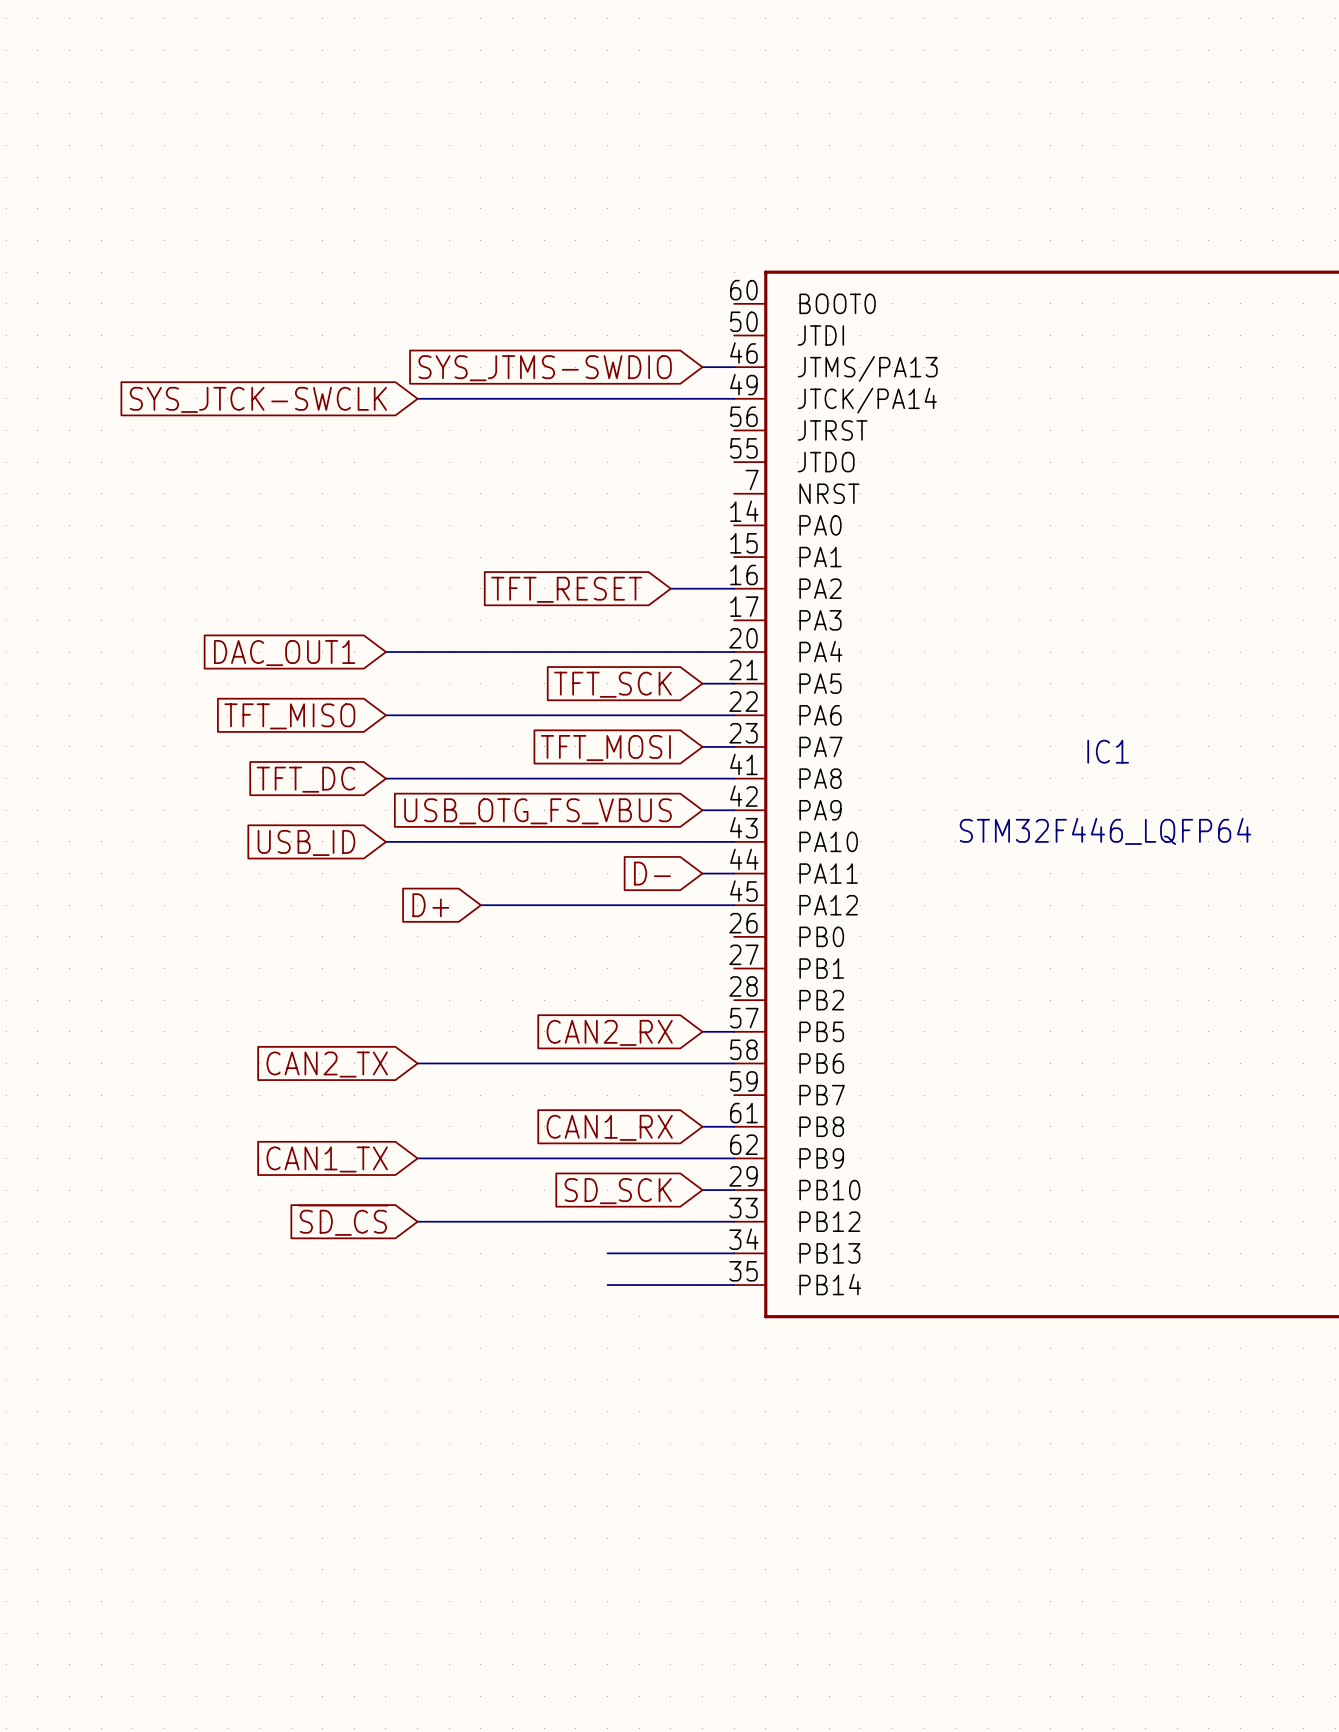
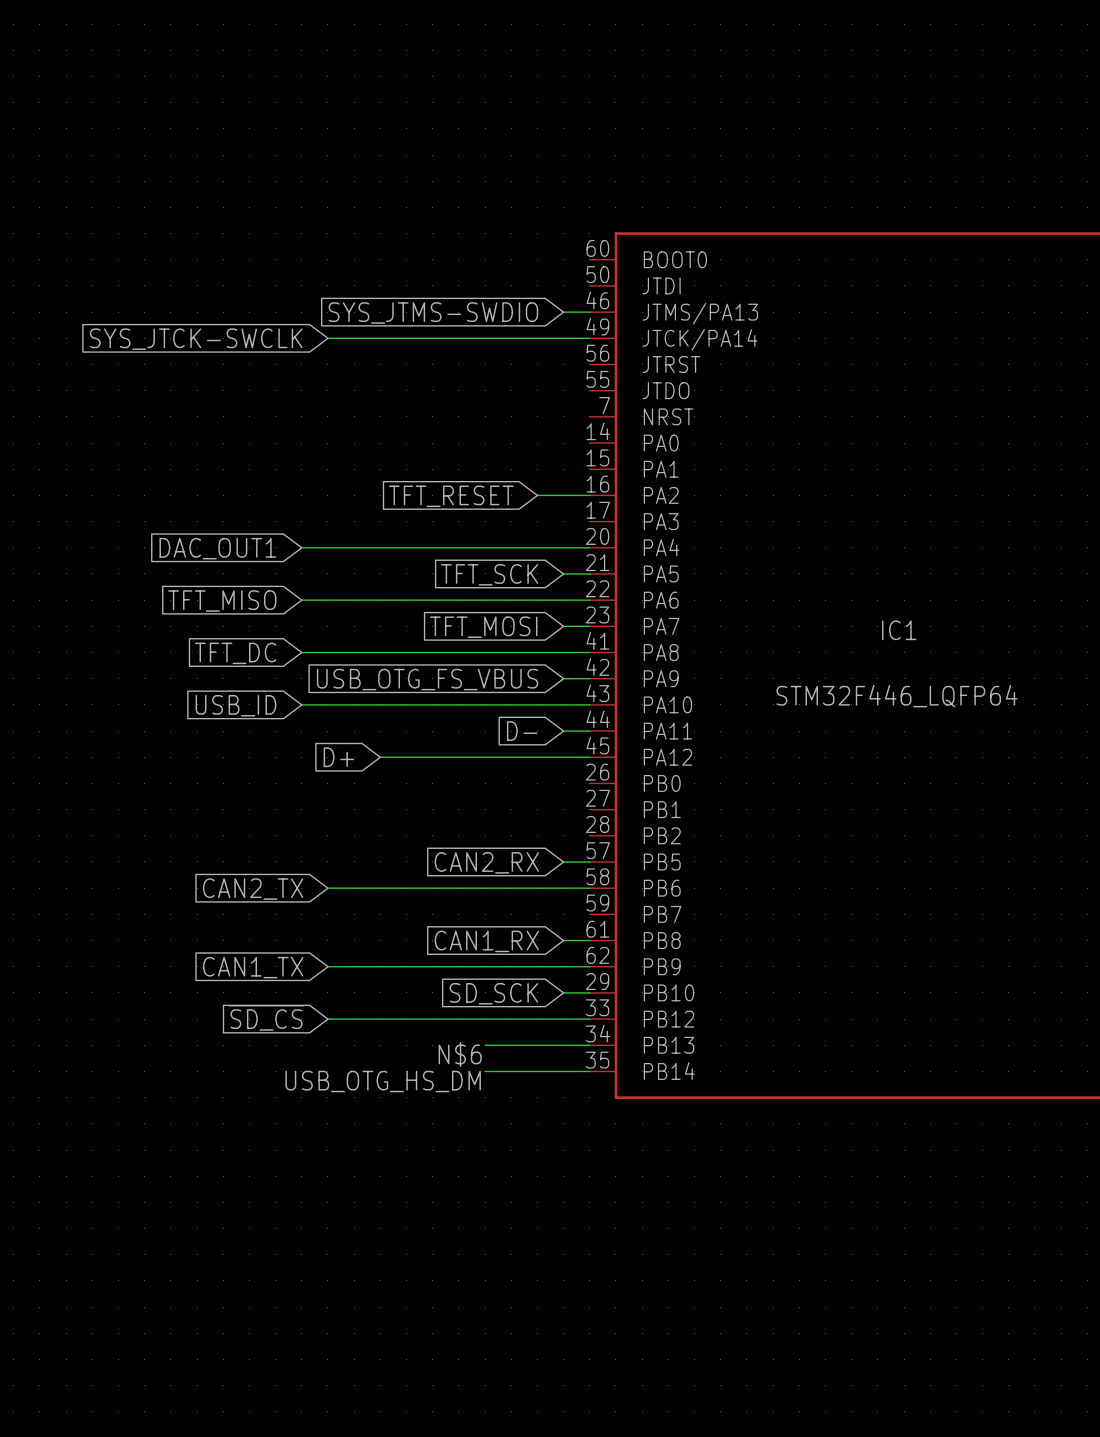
label: none -> N$6 (460, 1054)
label: none -> USB_OTG_HS_DM (383, 1081)

